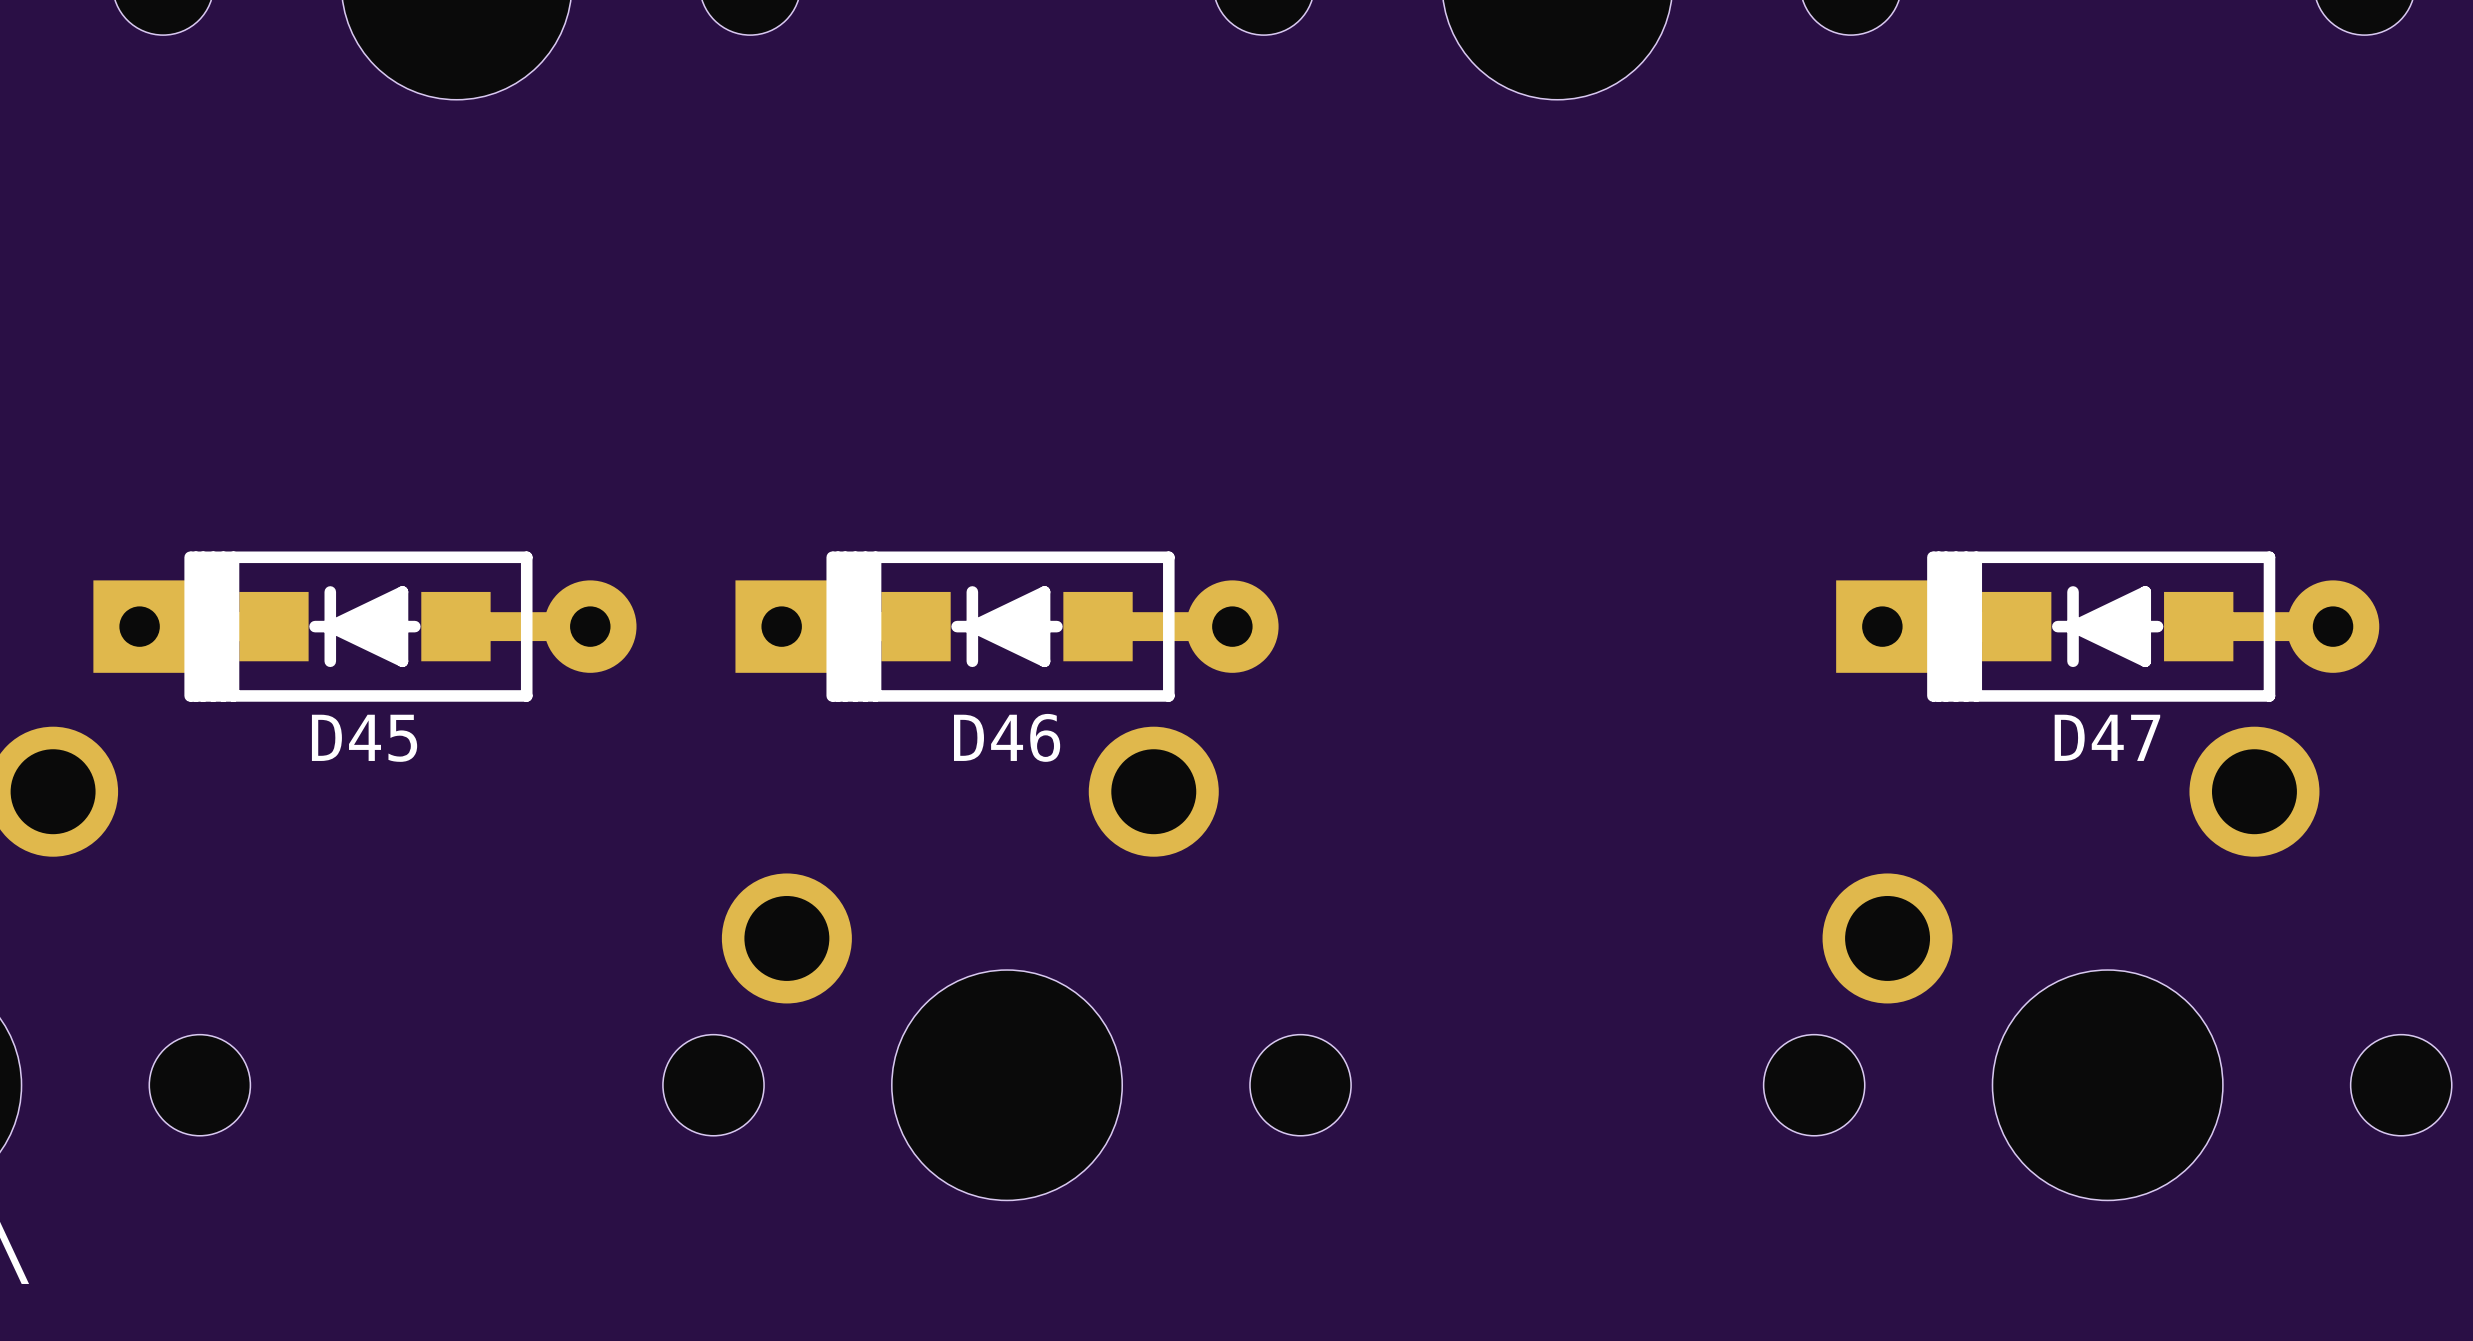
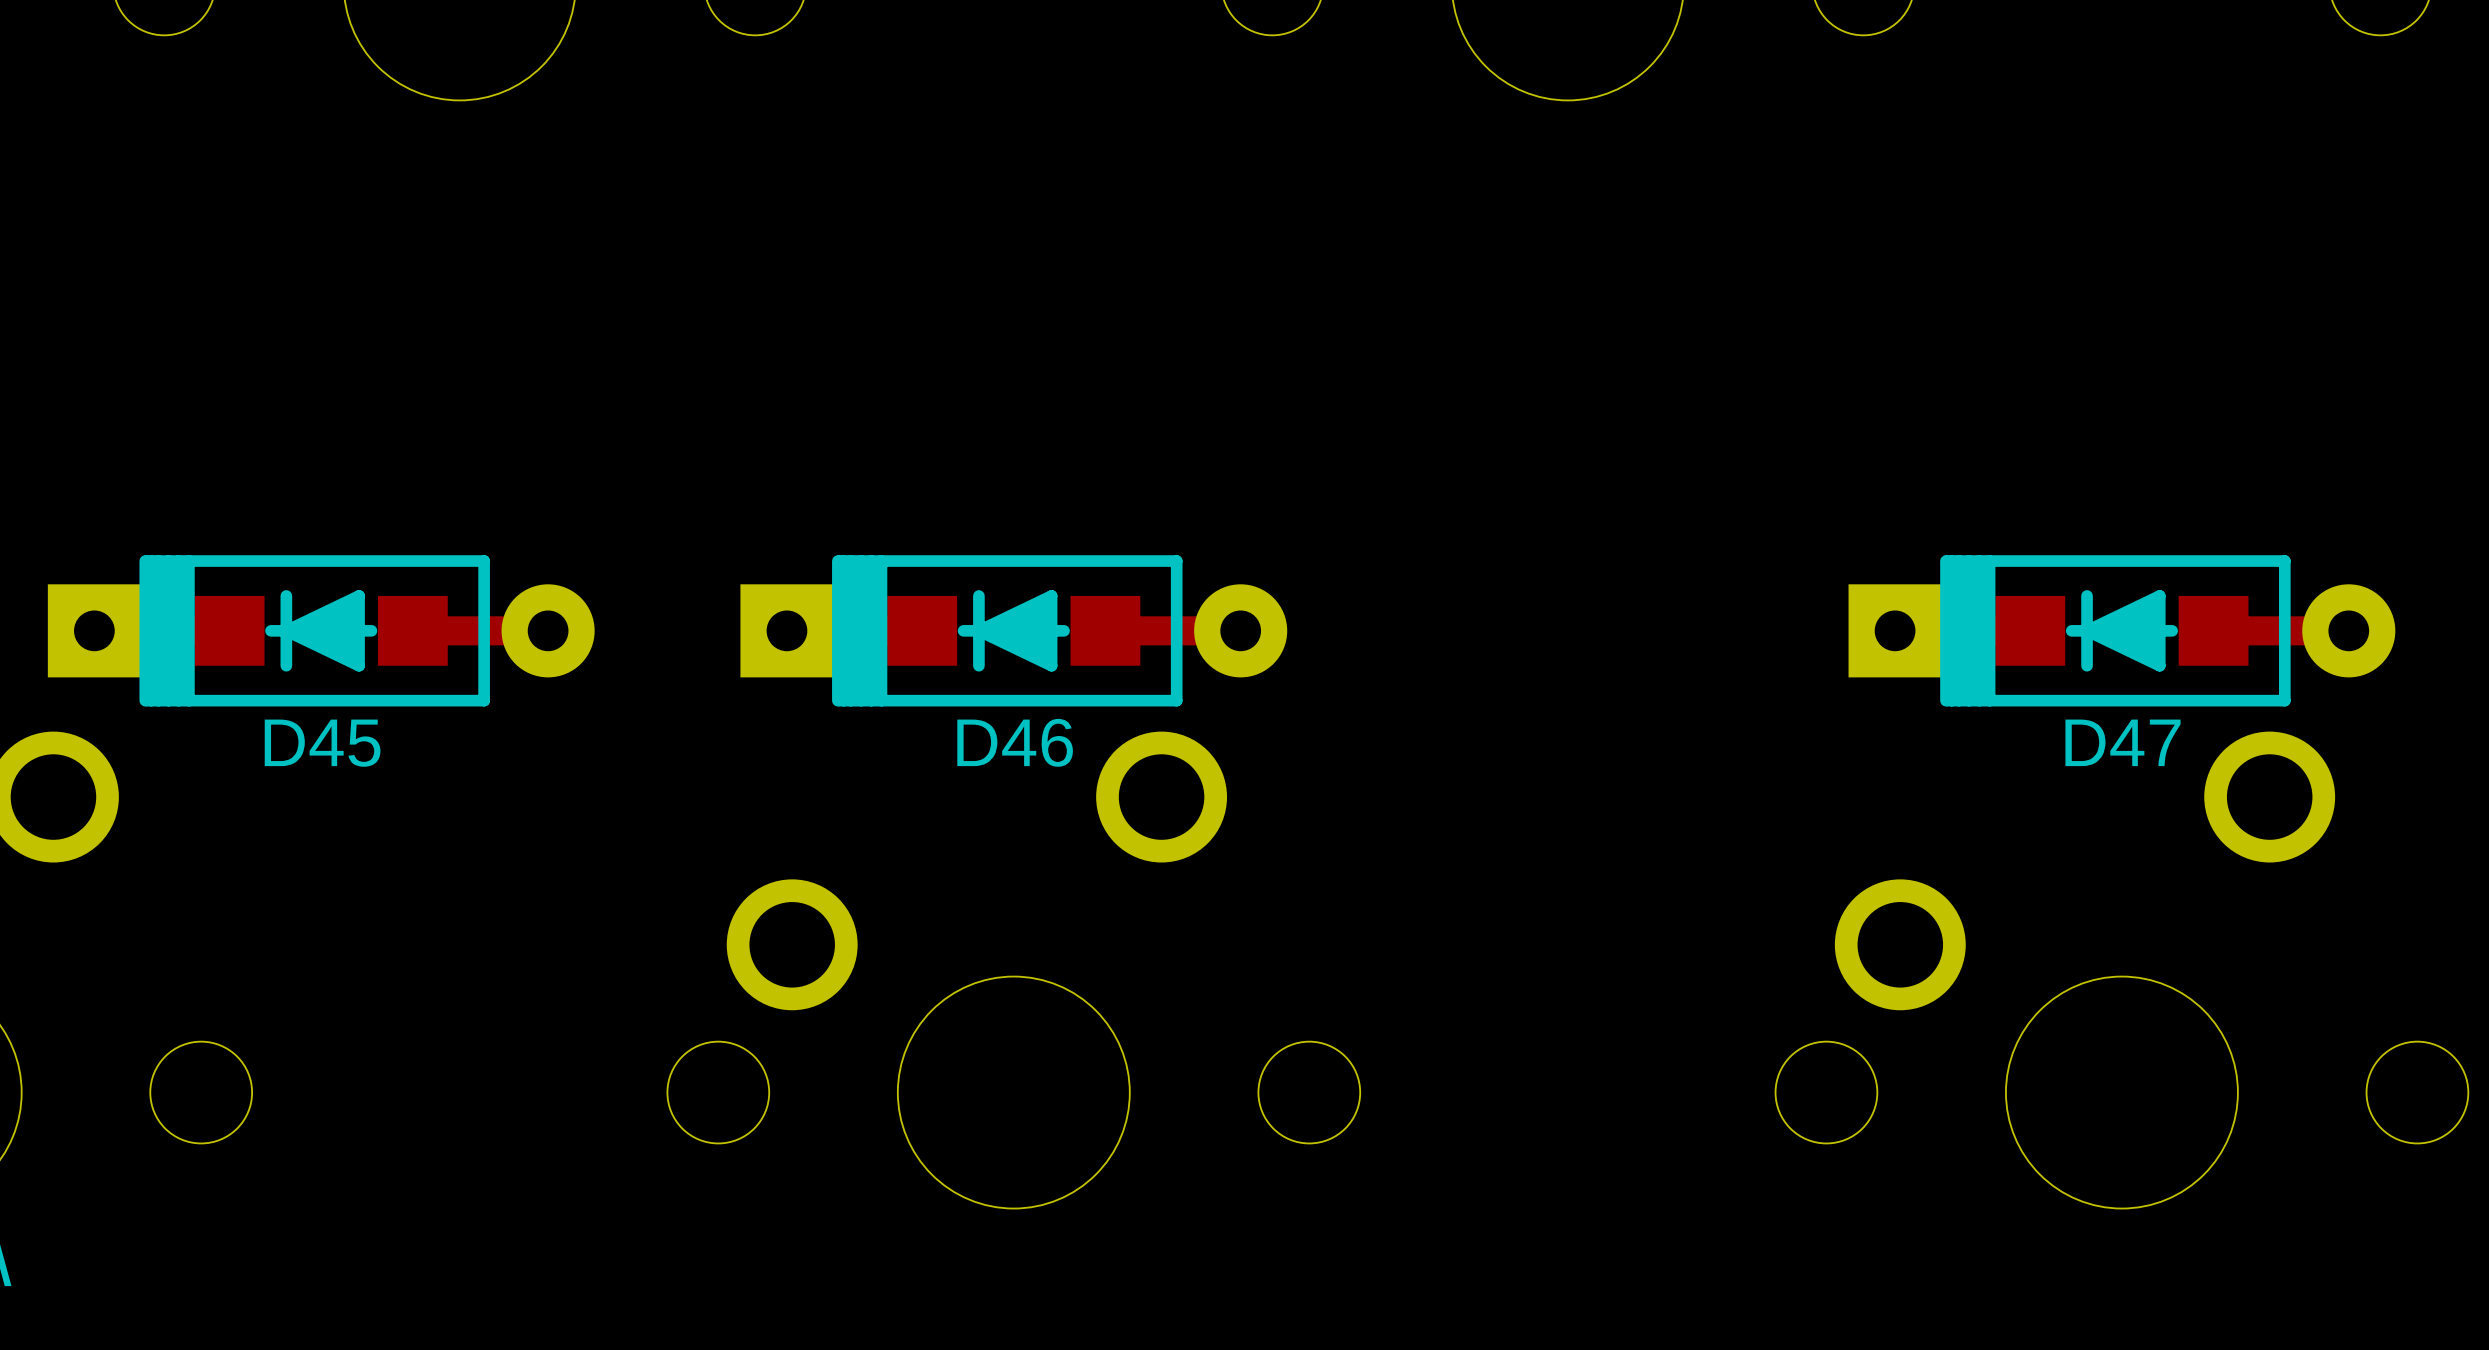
D45 position: (364, 626) -> (321, 630)

